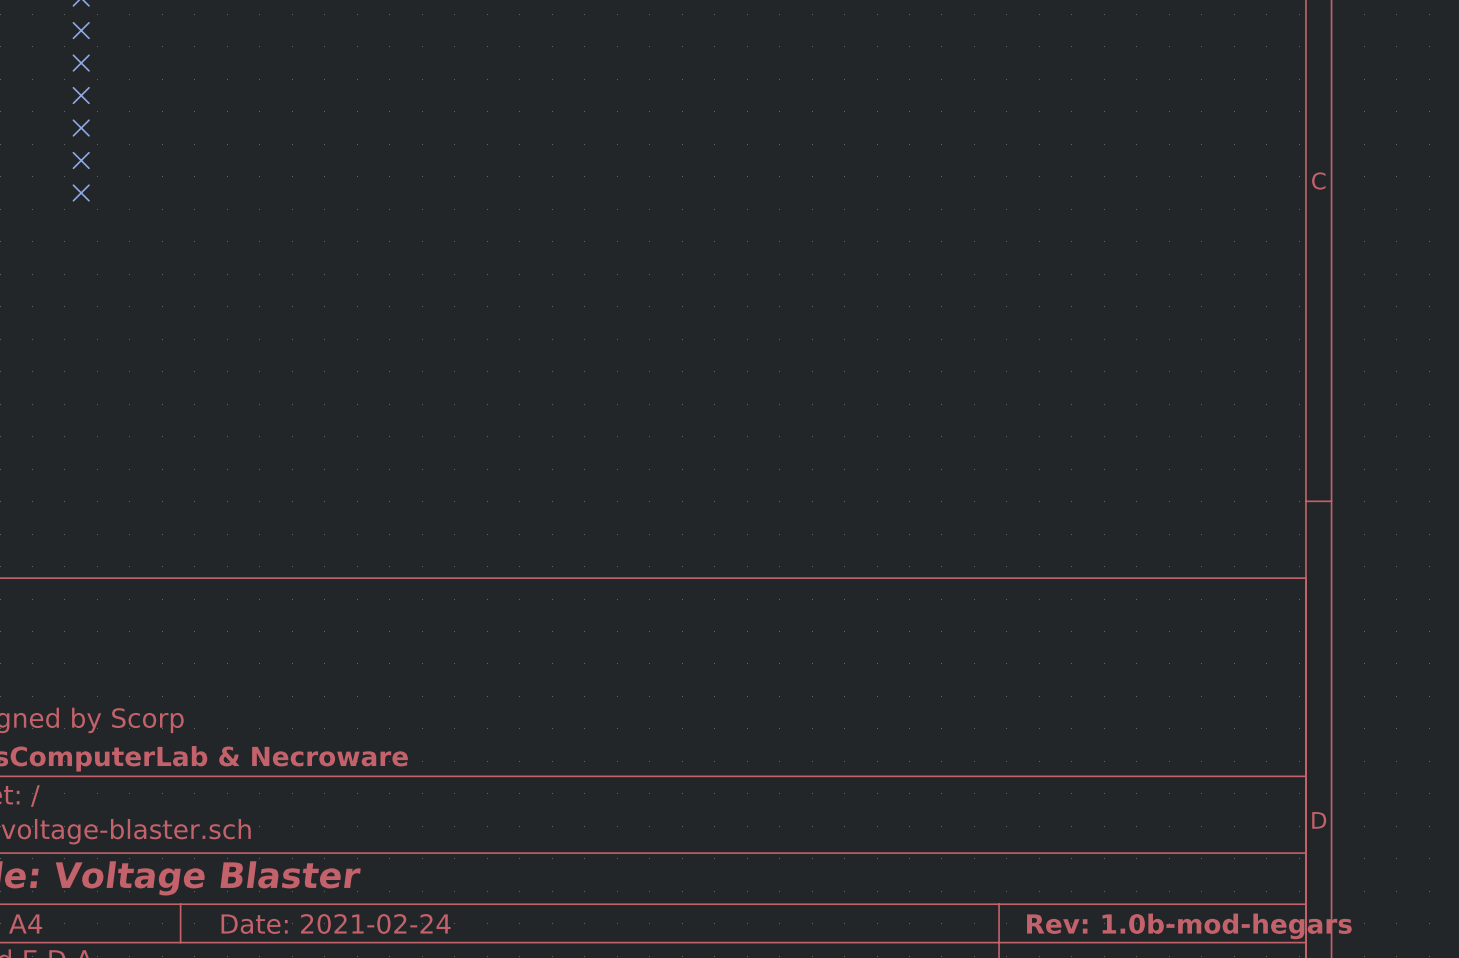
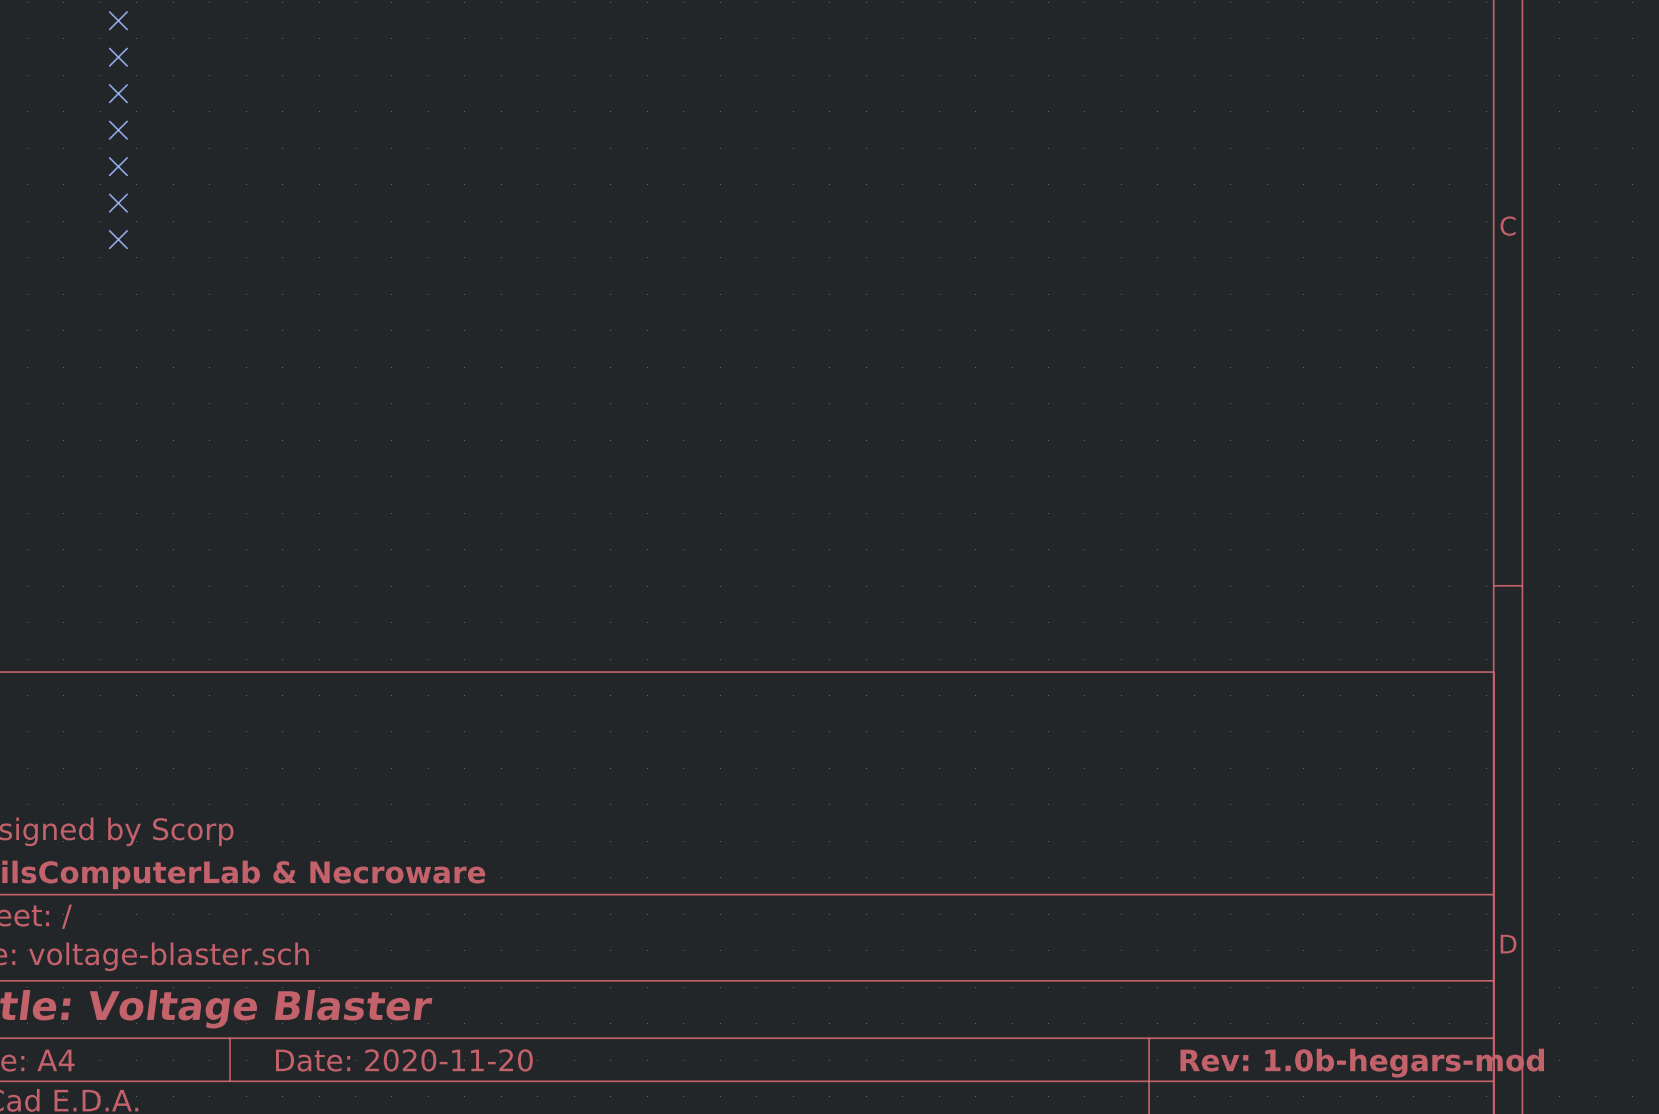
title block: Date: 2021-02-24 (336, 923) -> Date: 2020-11-20 (404, 1060)
title block: Rev: 1.0b-mod-hegars (1189, 926) -> Rev: 1.0b-hegars-mod (1362, 1063)

